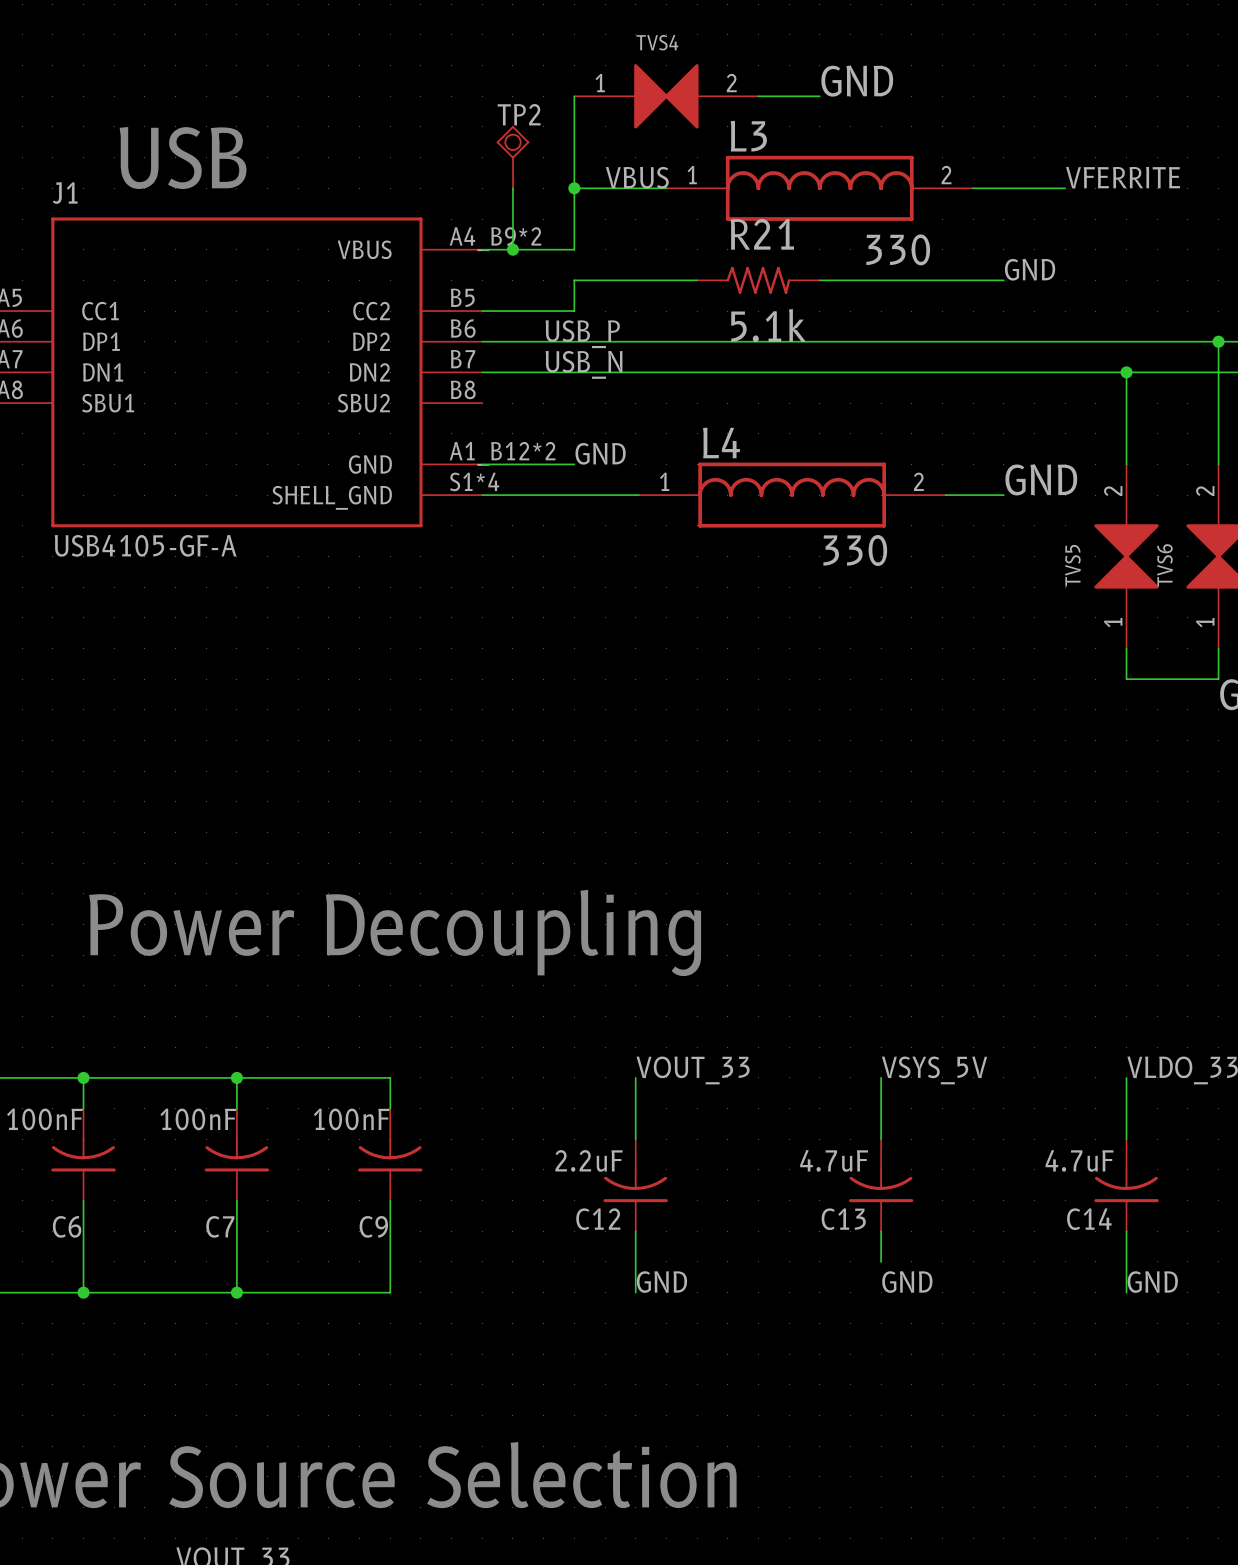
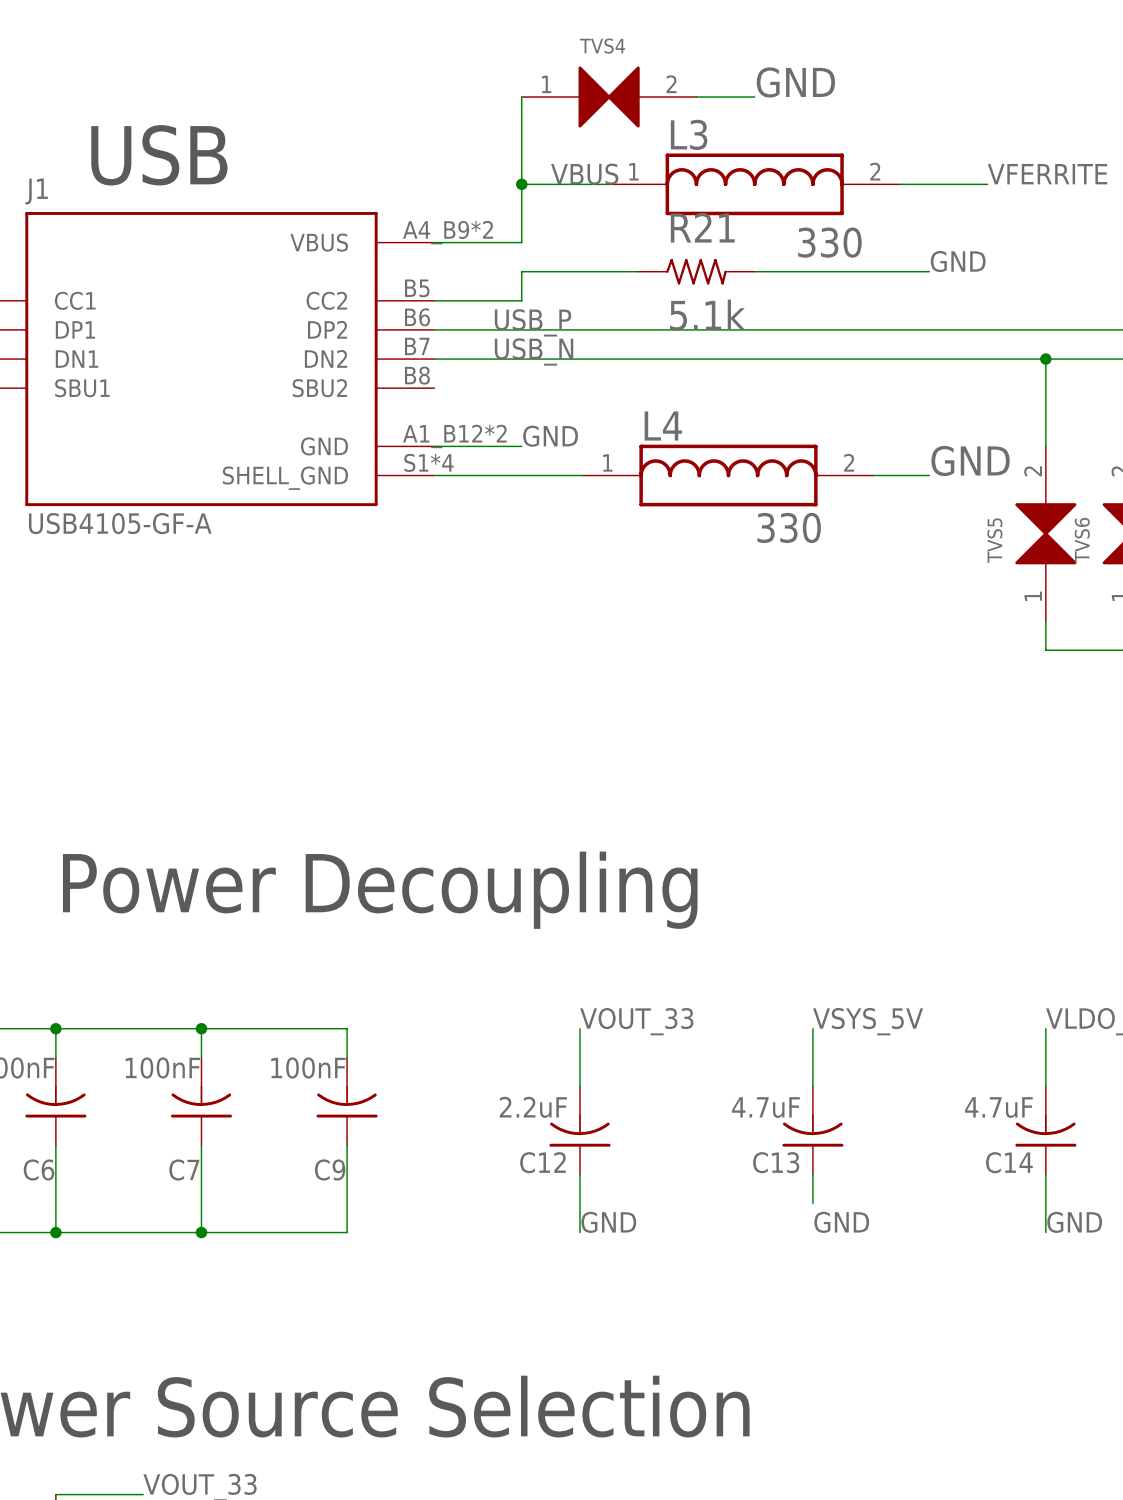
TP2: (512, 157) -> none
wire: (512, 188) (512, 249) -> none
junction: (512, 249) -> none

